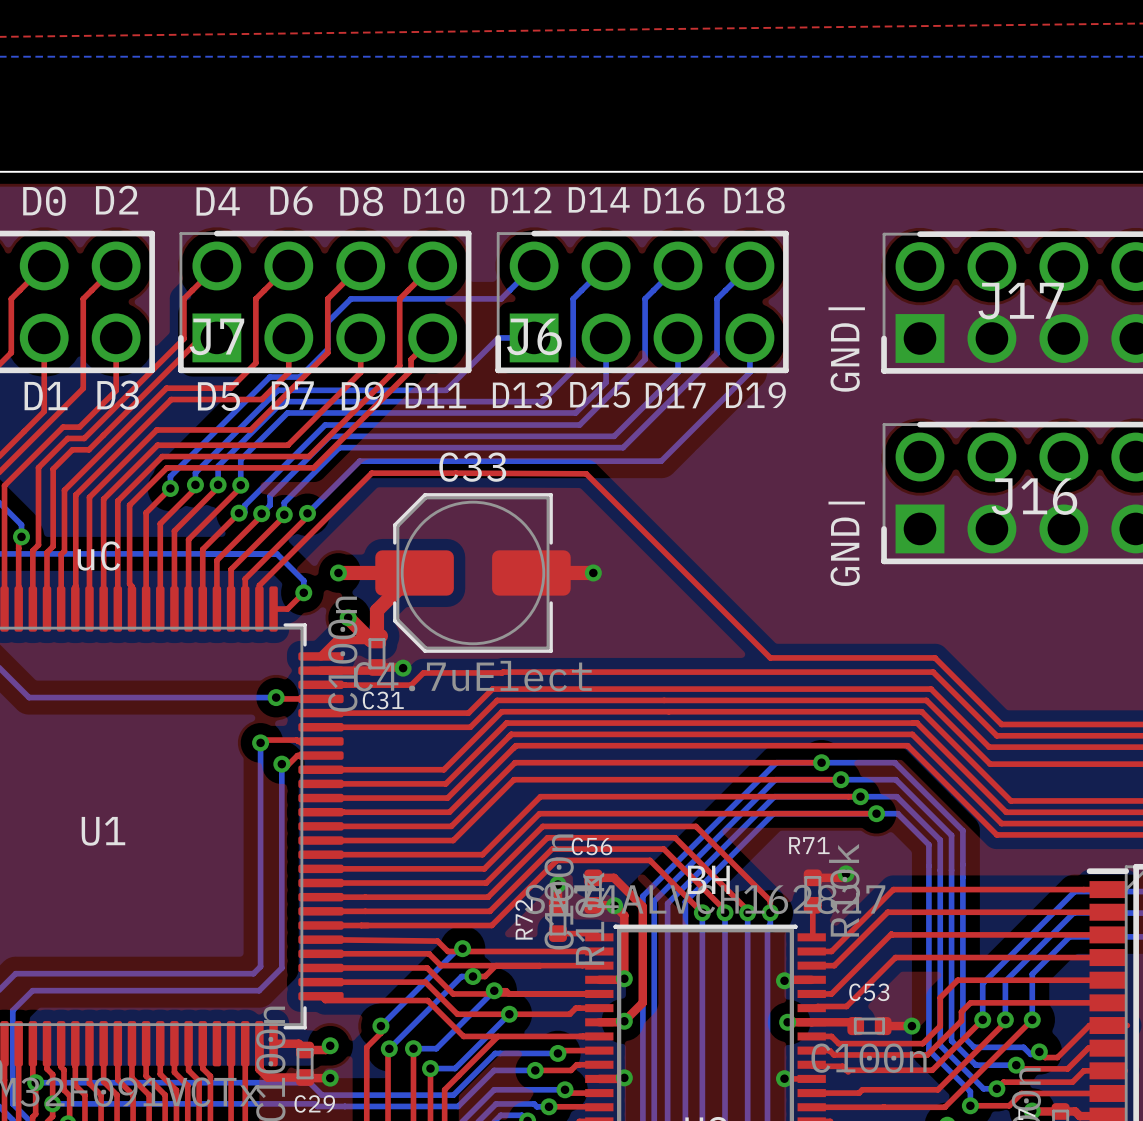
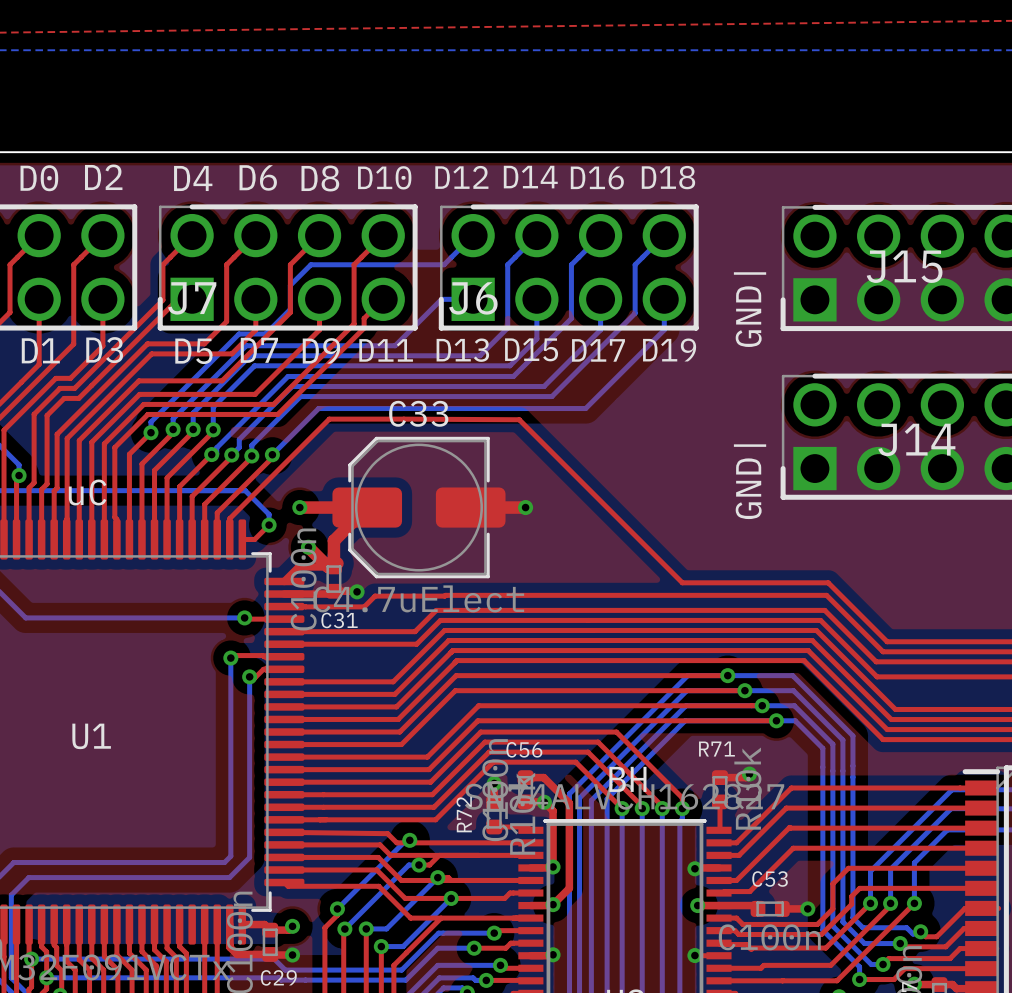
J17 name: J17 (1021, 301) -> J15 (904, 266)
J16 name: J16 (1034, 496) -> J14 (916, 439)

